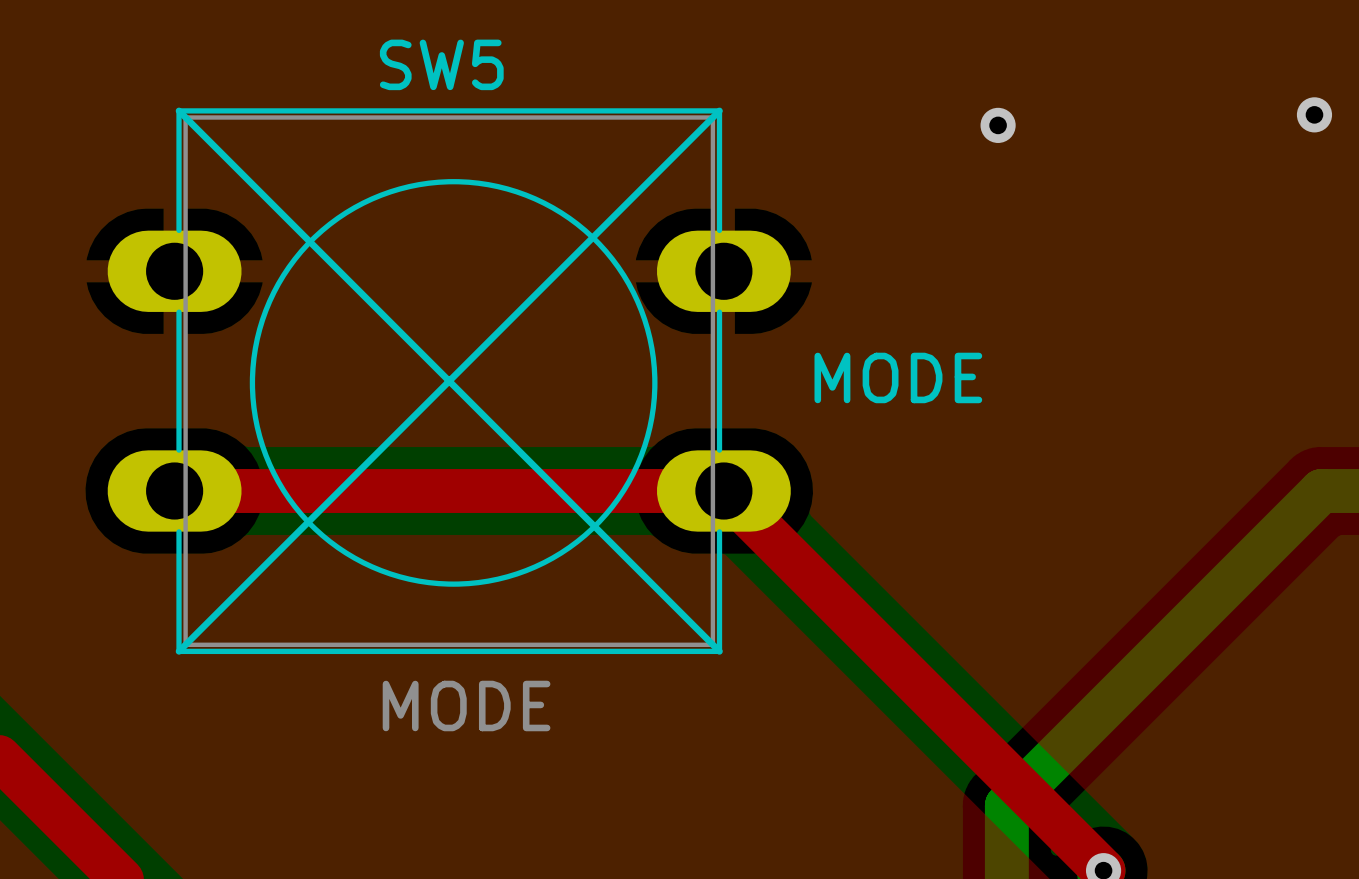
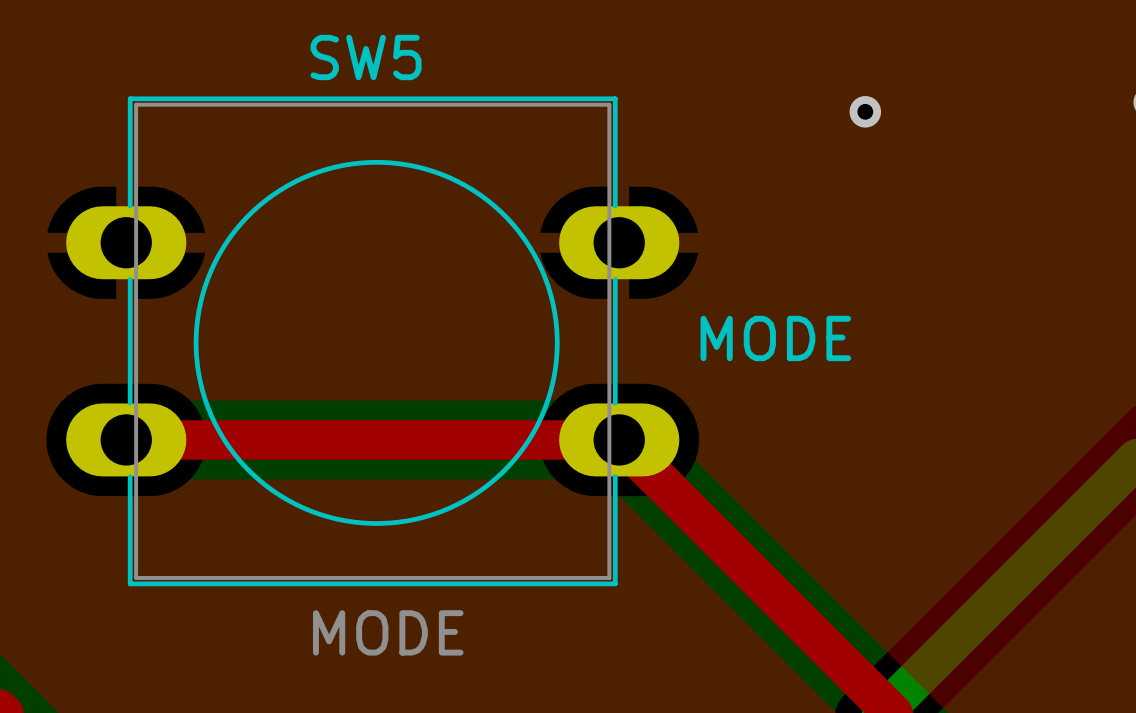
line: (179, 110) (719, 651) -> none
line: (719, 110) (179, 651) -> none

